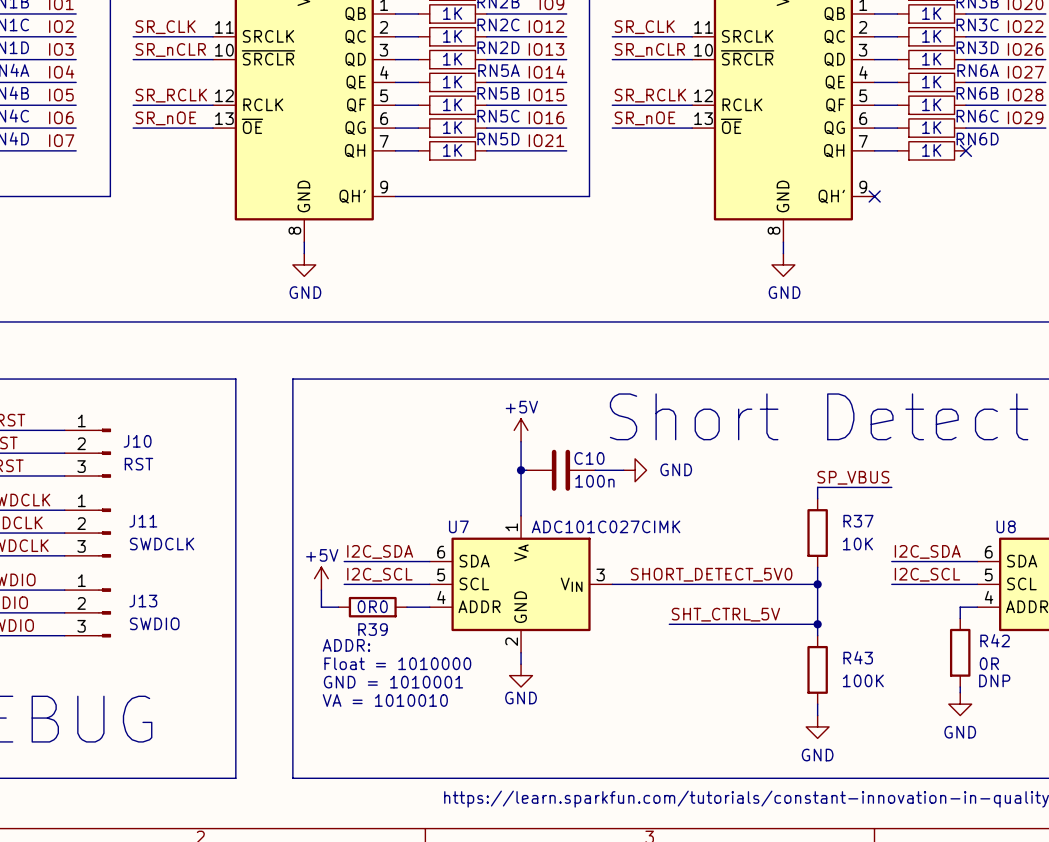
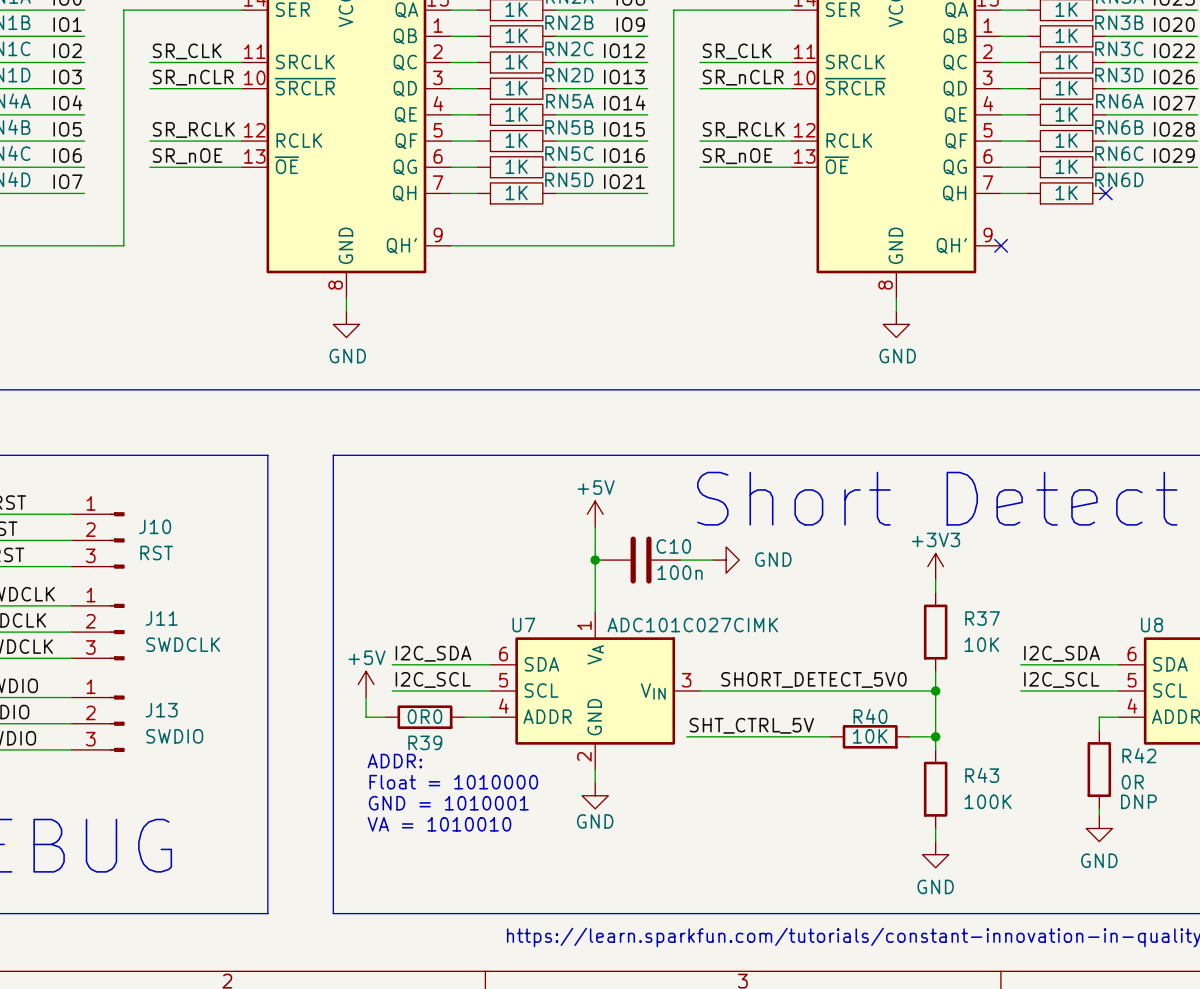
power symbol: none -> +3V3 (935, 566)
label: SP_VBUS (853, 477) -> none
wire: (817, 487) (891, 487) -> none
label position: SHT_CTRL_5V (725, 614) -> SHT_CTRL_5V (751, 725)
wire: (726, 624) (794, 624) -> (686, 736) (765, 736)
R40: none -> 10K (870, 736)

